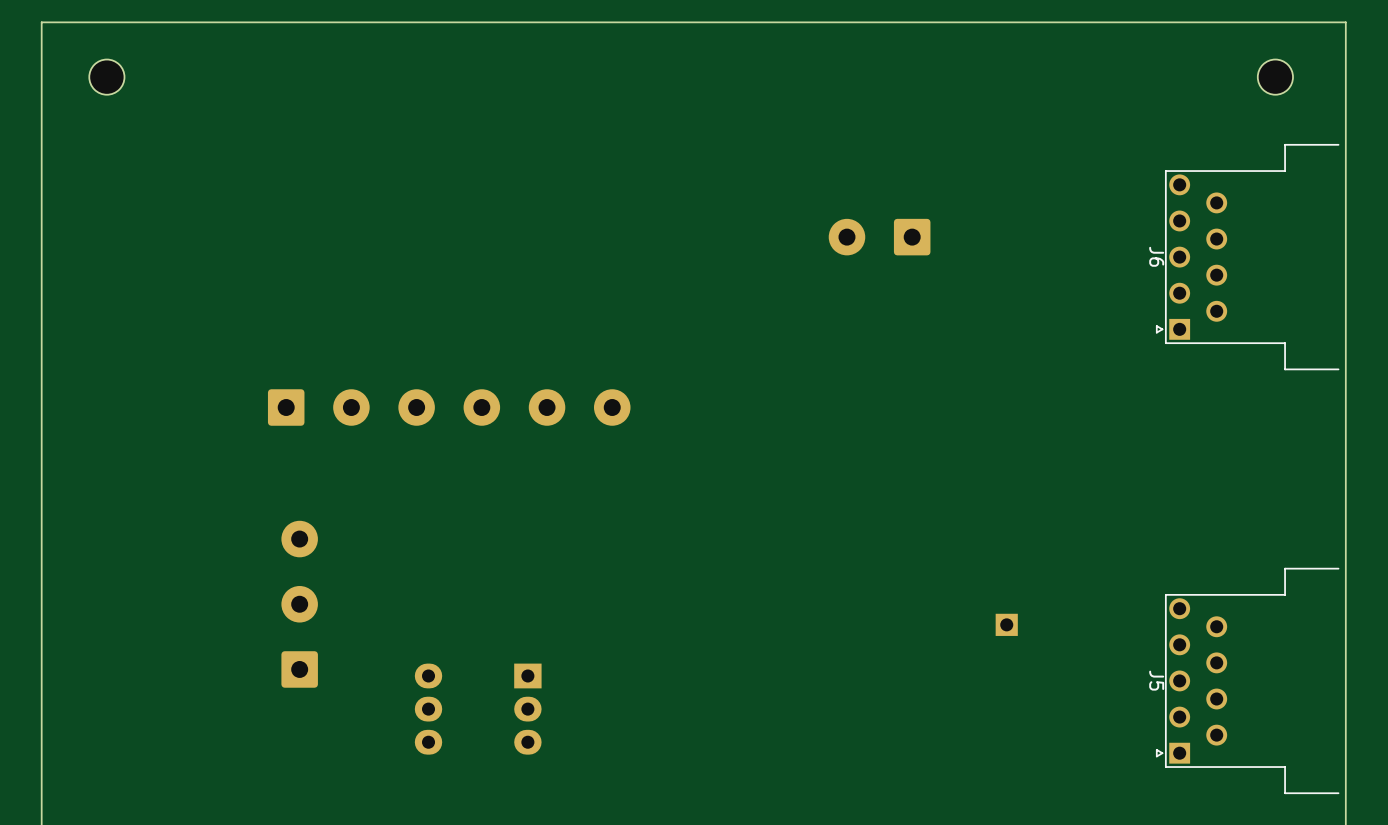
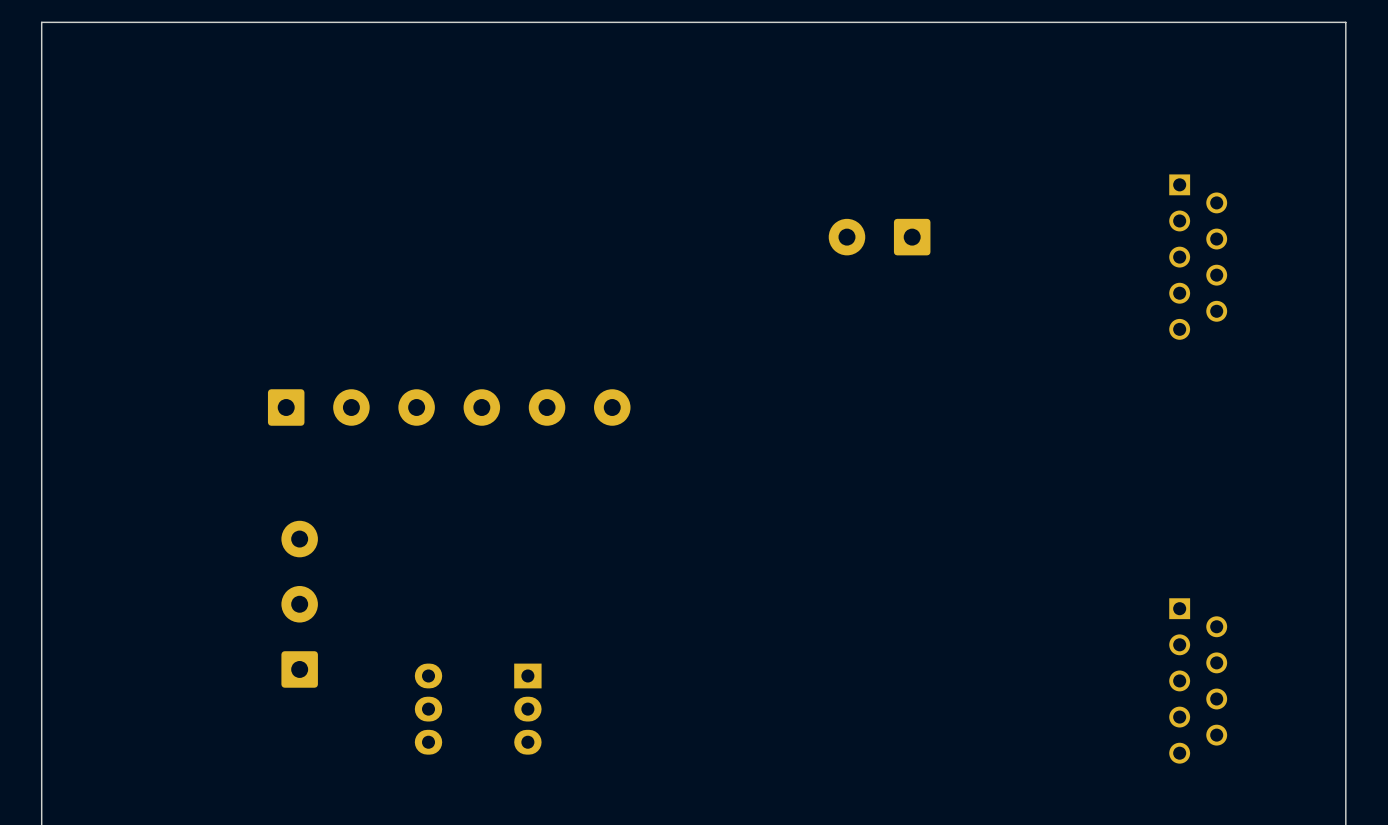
part: (106, 77) -> none
part: (1275, 77) -> none
J6 side: bottom (1247, 257) -> top (1198, 257)
part: (1006, 624) -> none
J5 side: bottom (1247, 680) -> top (1198, 680)

